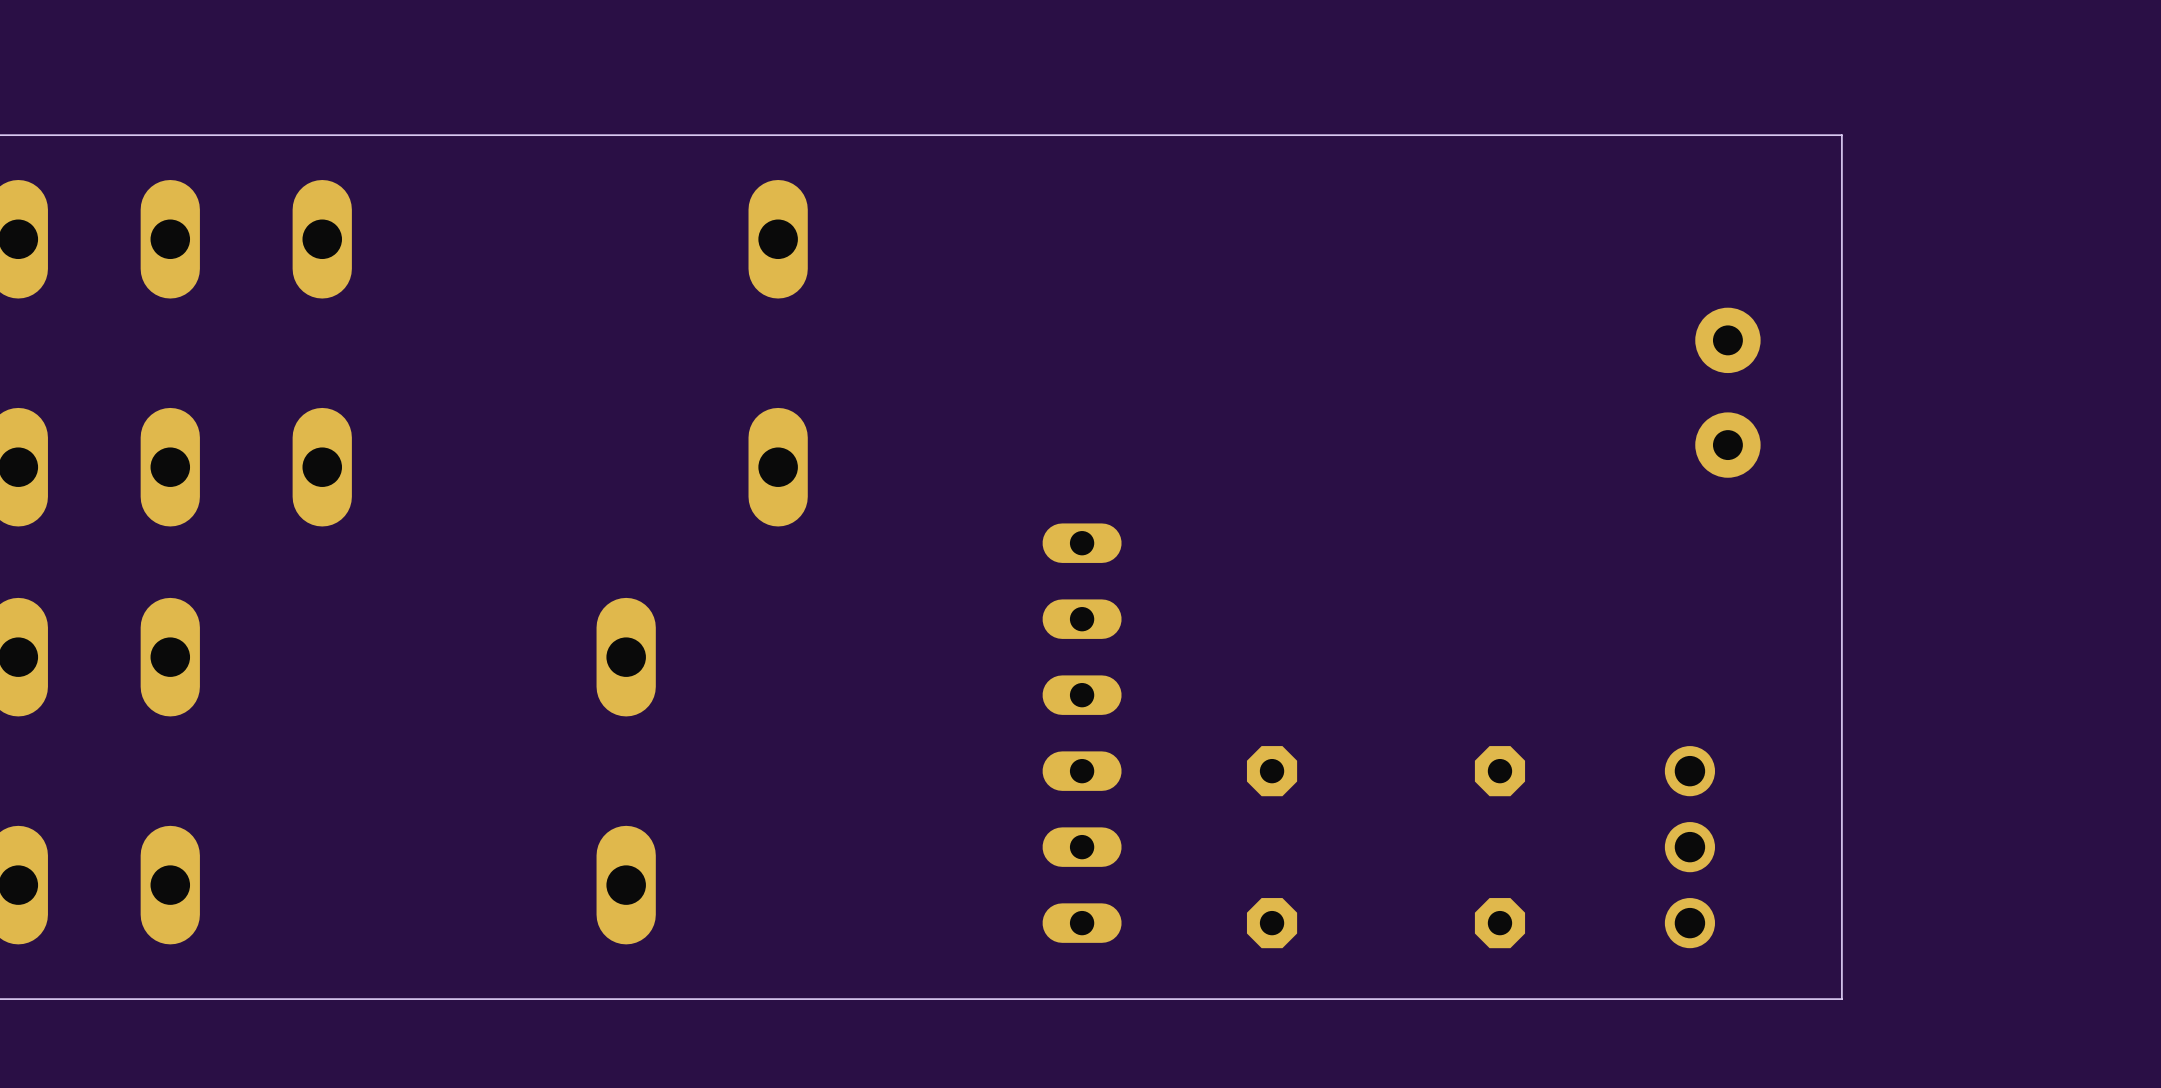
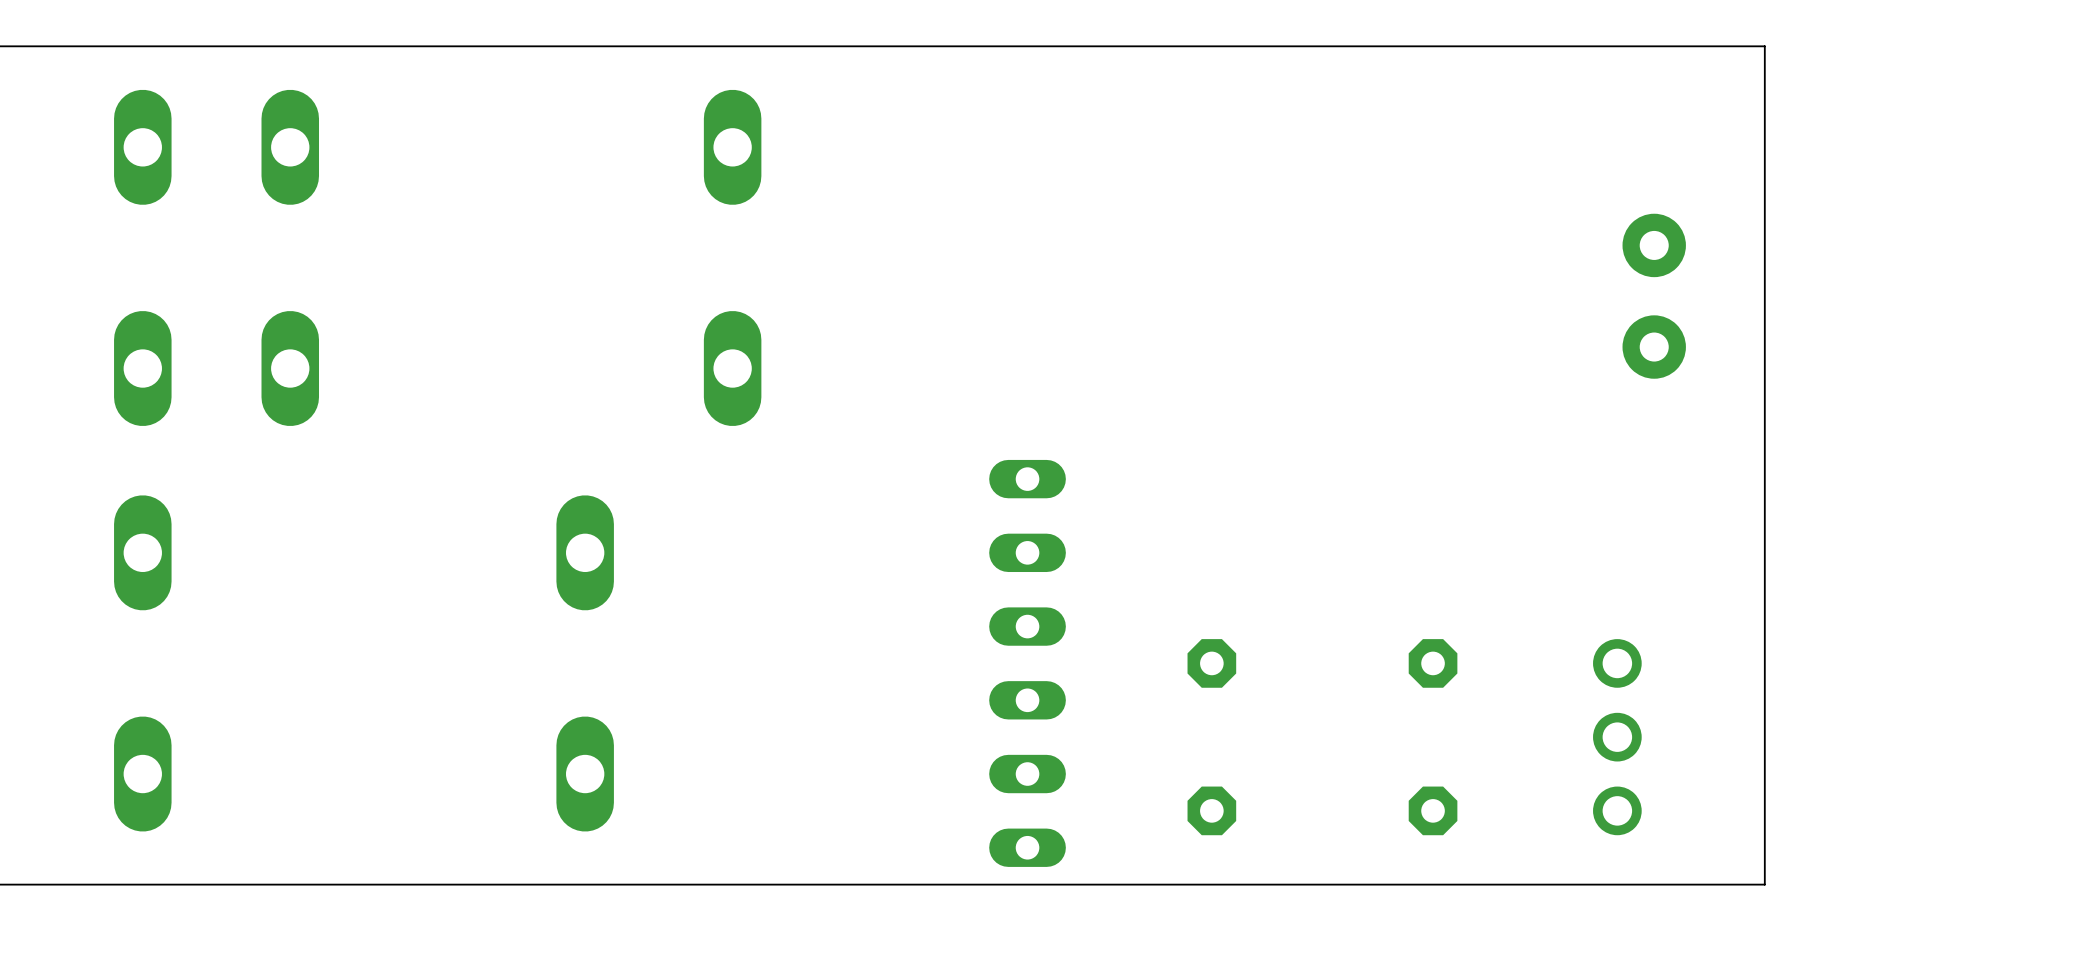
part position: (1082, 619) -> (1027, 552)
part position: (1082, 847) -> (1027, 774)

